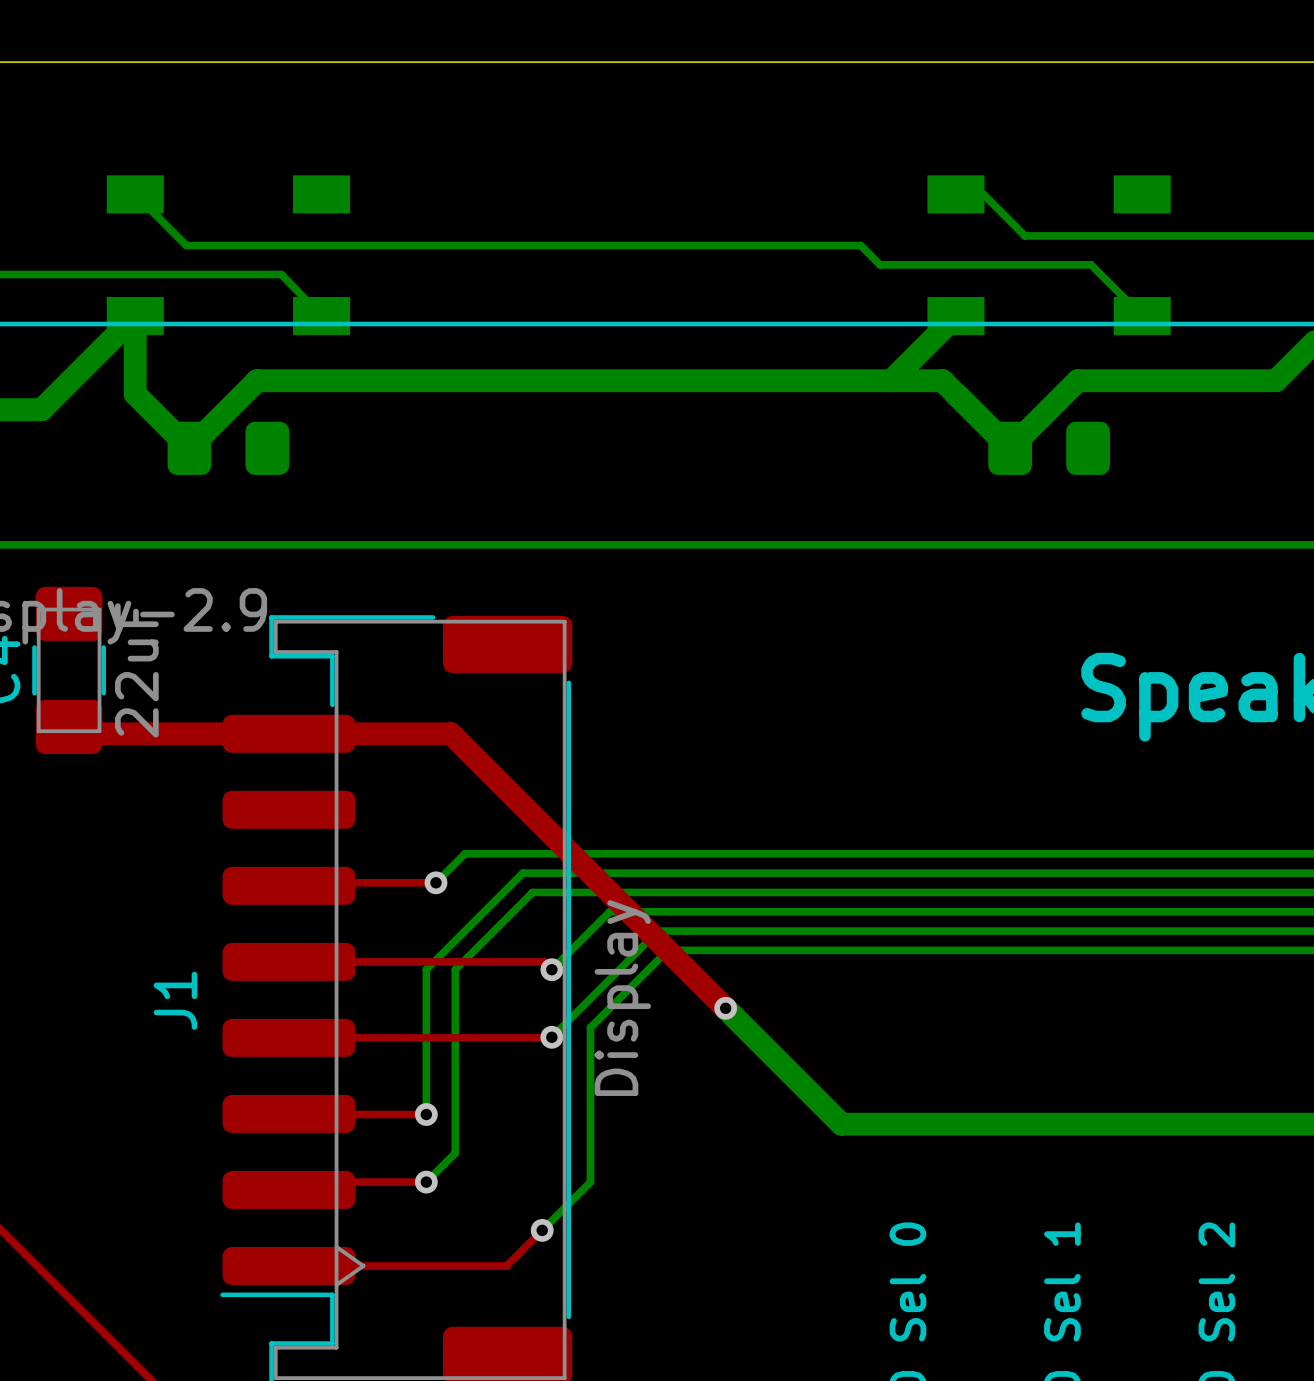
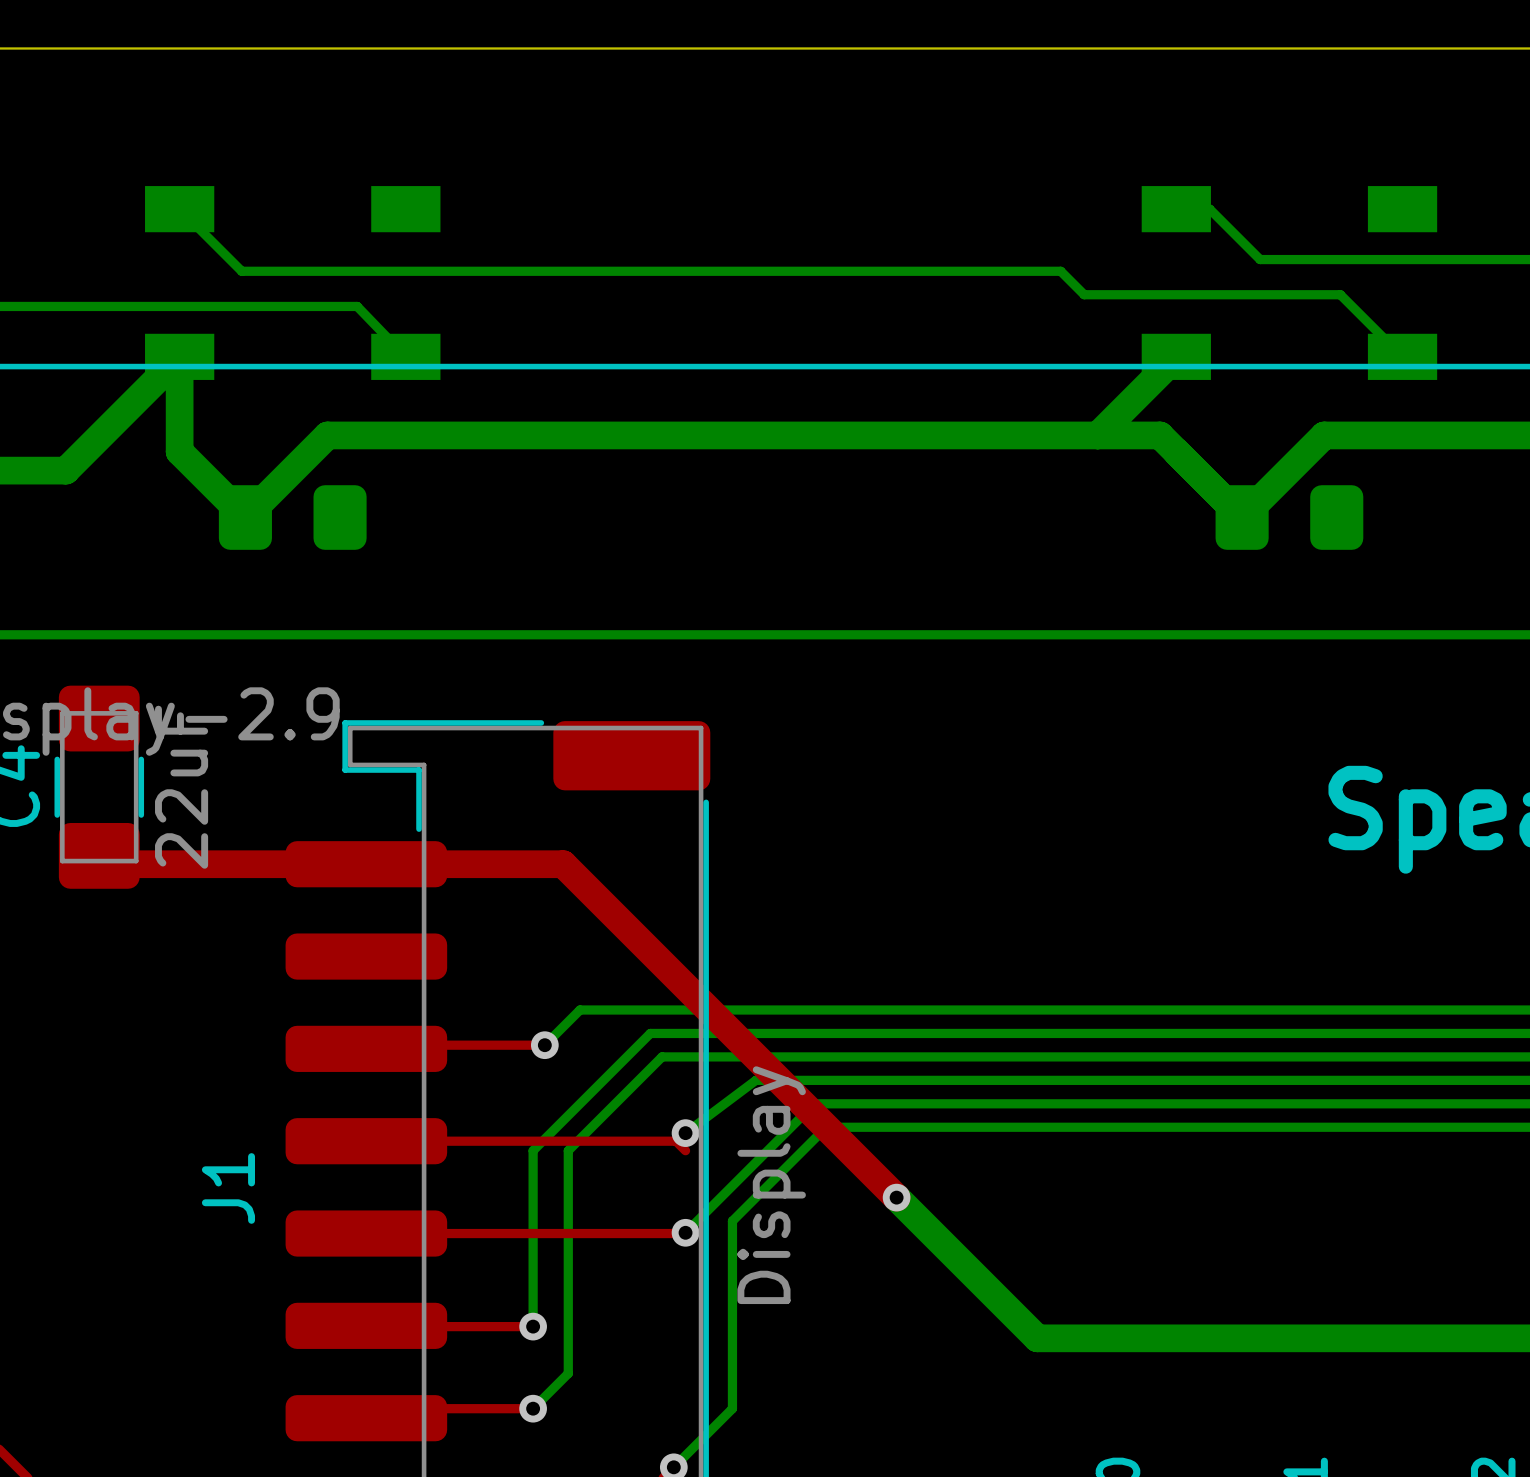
bottom track: (609, 911) (551, 969) -> (755, 1080) (685, 1133)
via position: (551, 969) -> (685, 1133)

